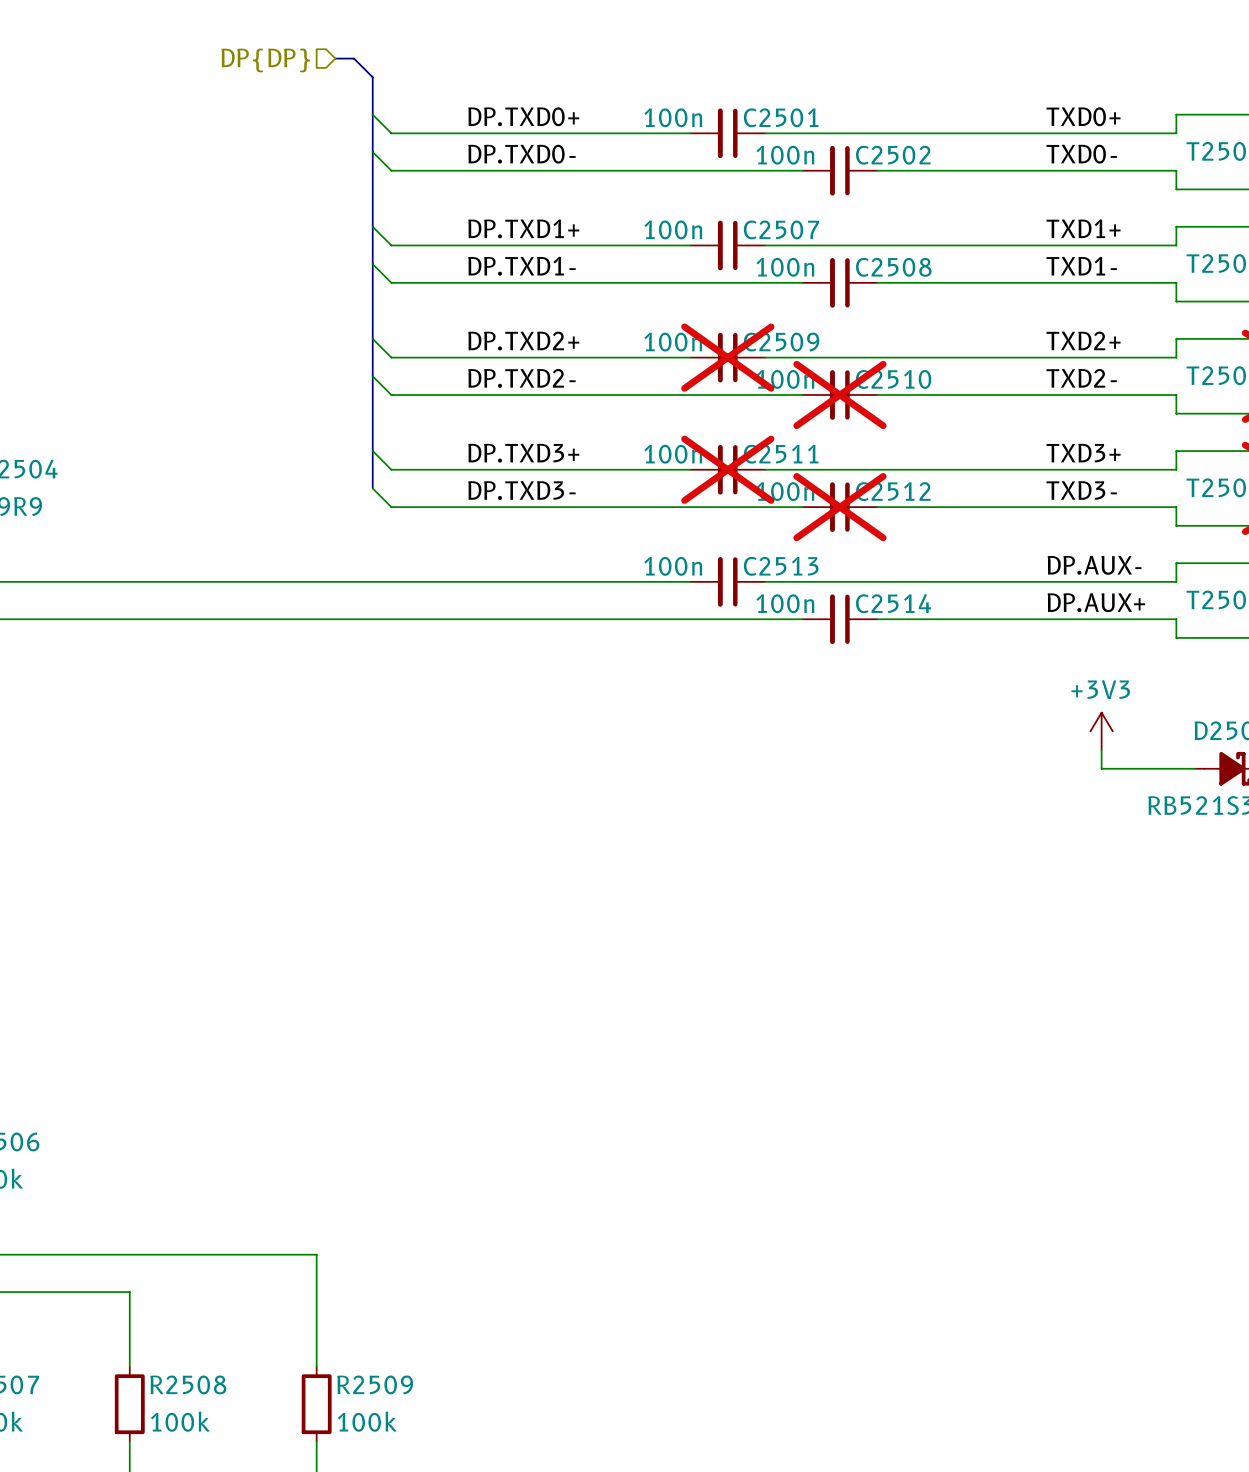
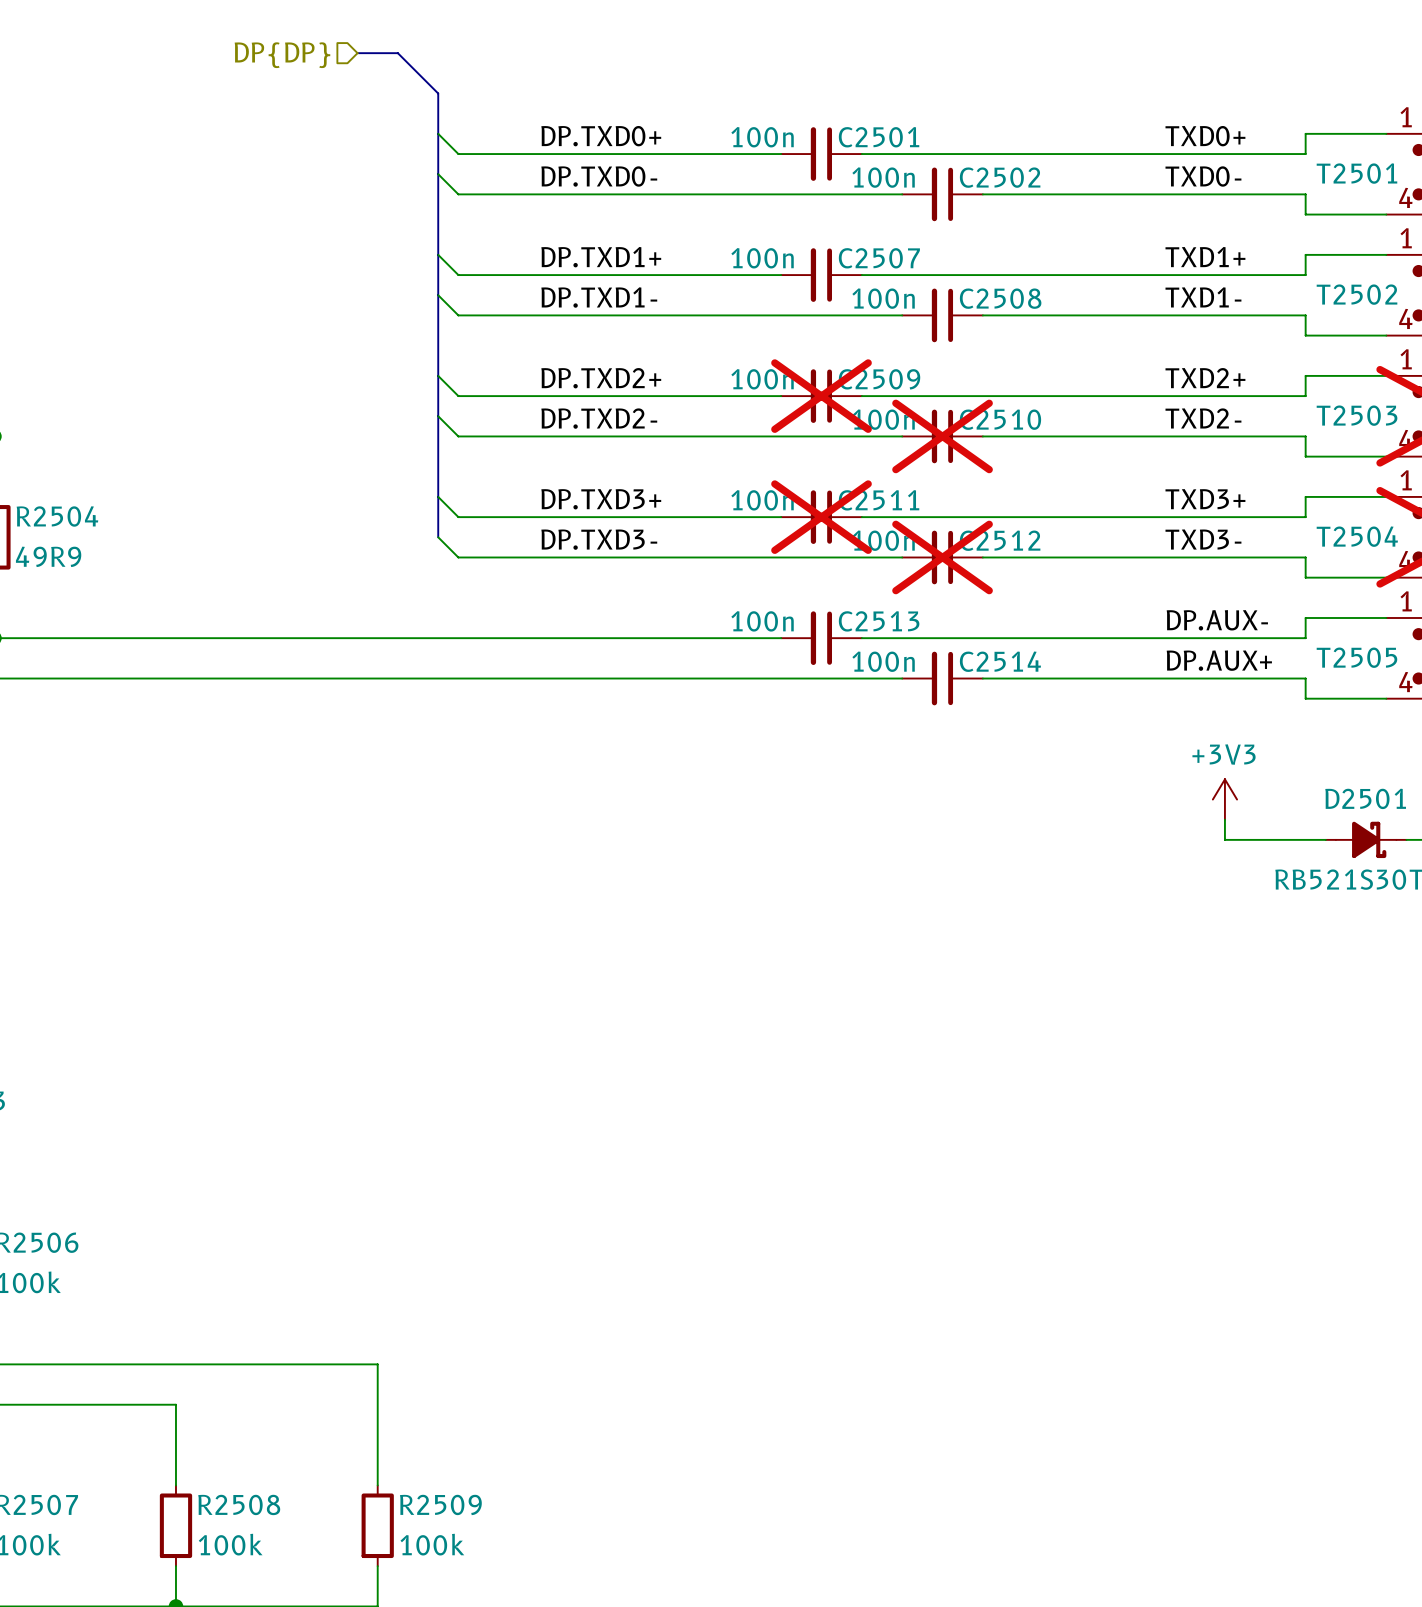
bus: (335, 58) (354, 58) -> (357, 53) (397, 53) (418, 73)
hierarchical label position: DP{DP} (265, 60) -> DP{DP} (282, 55)

